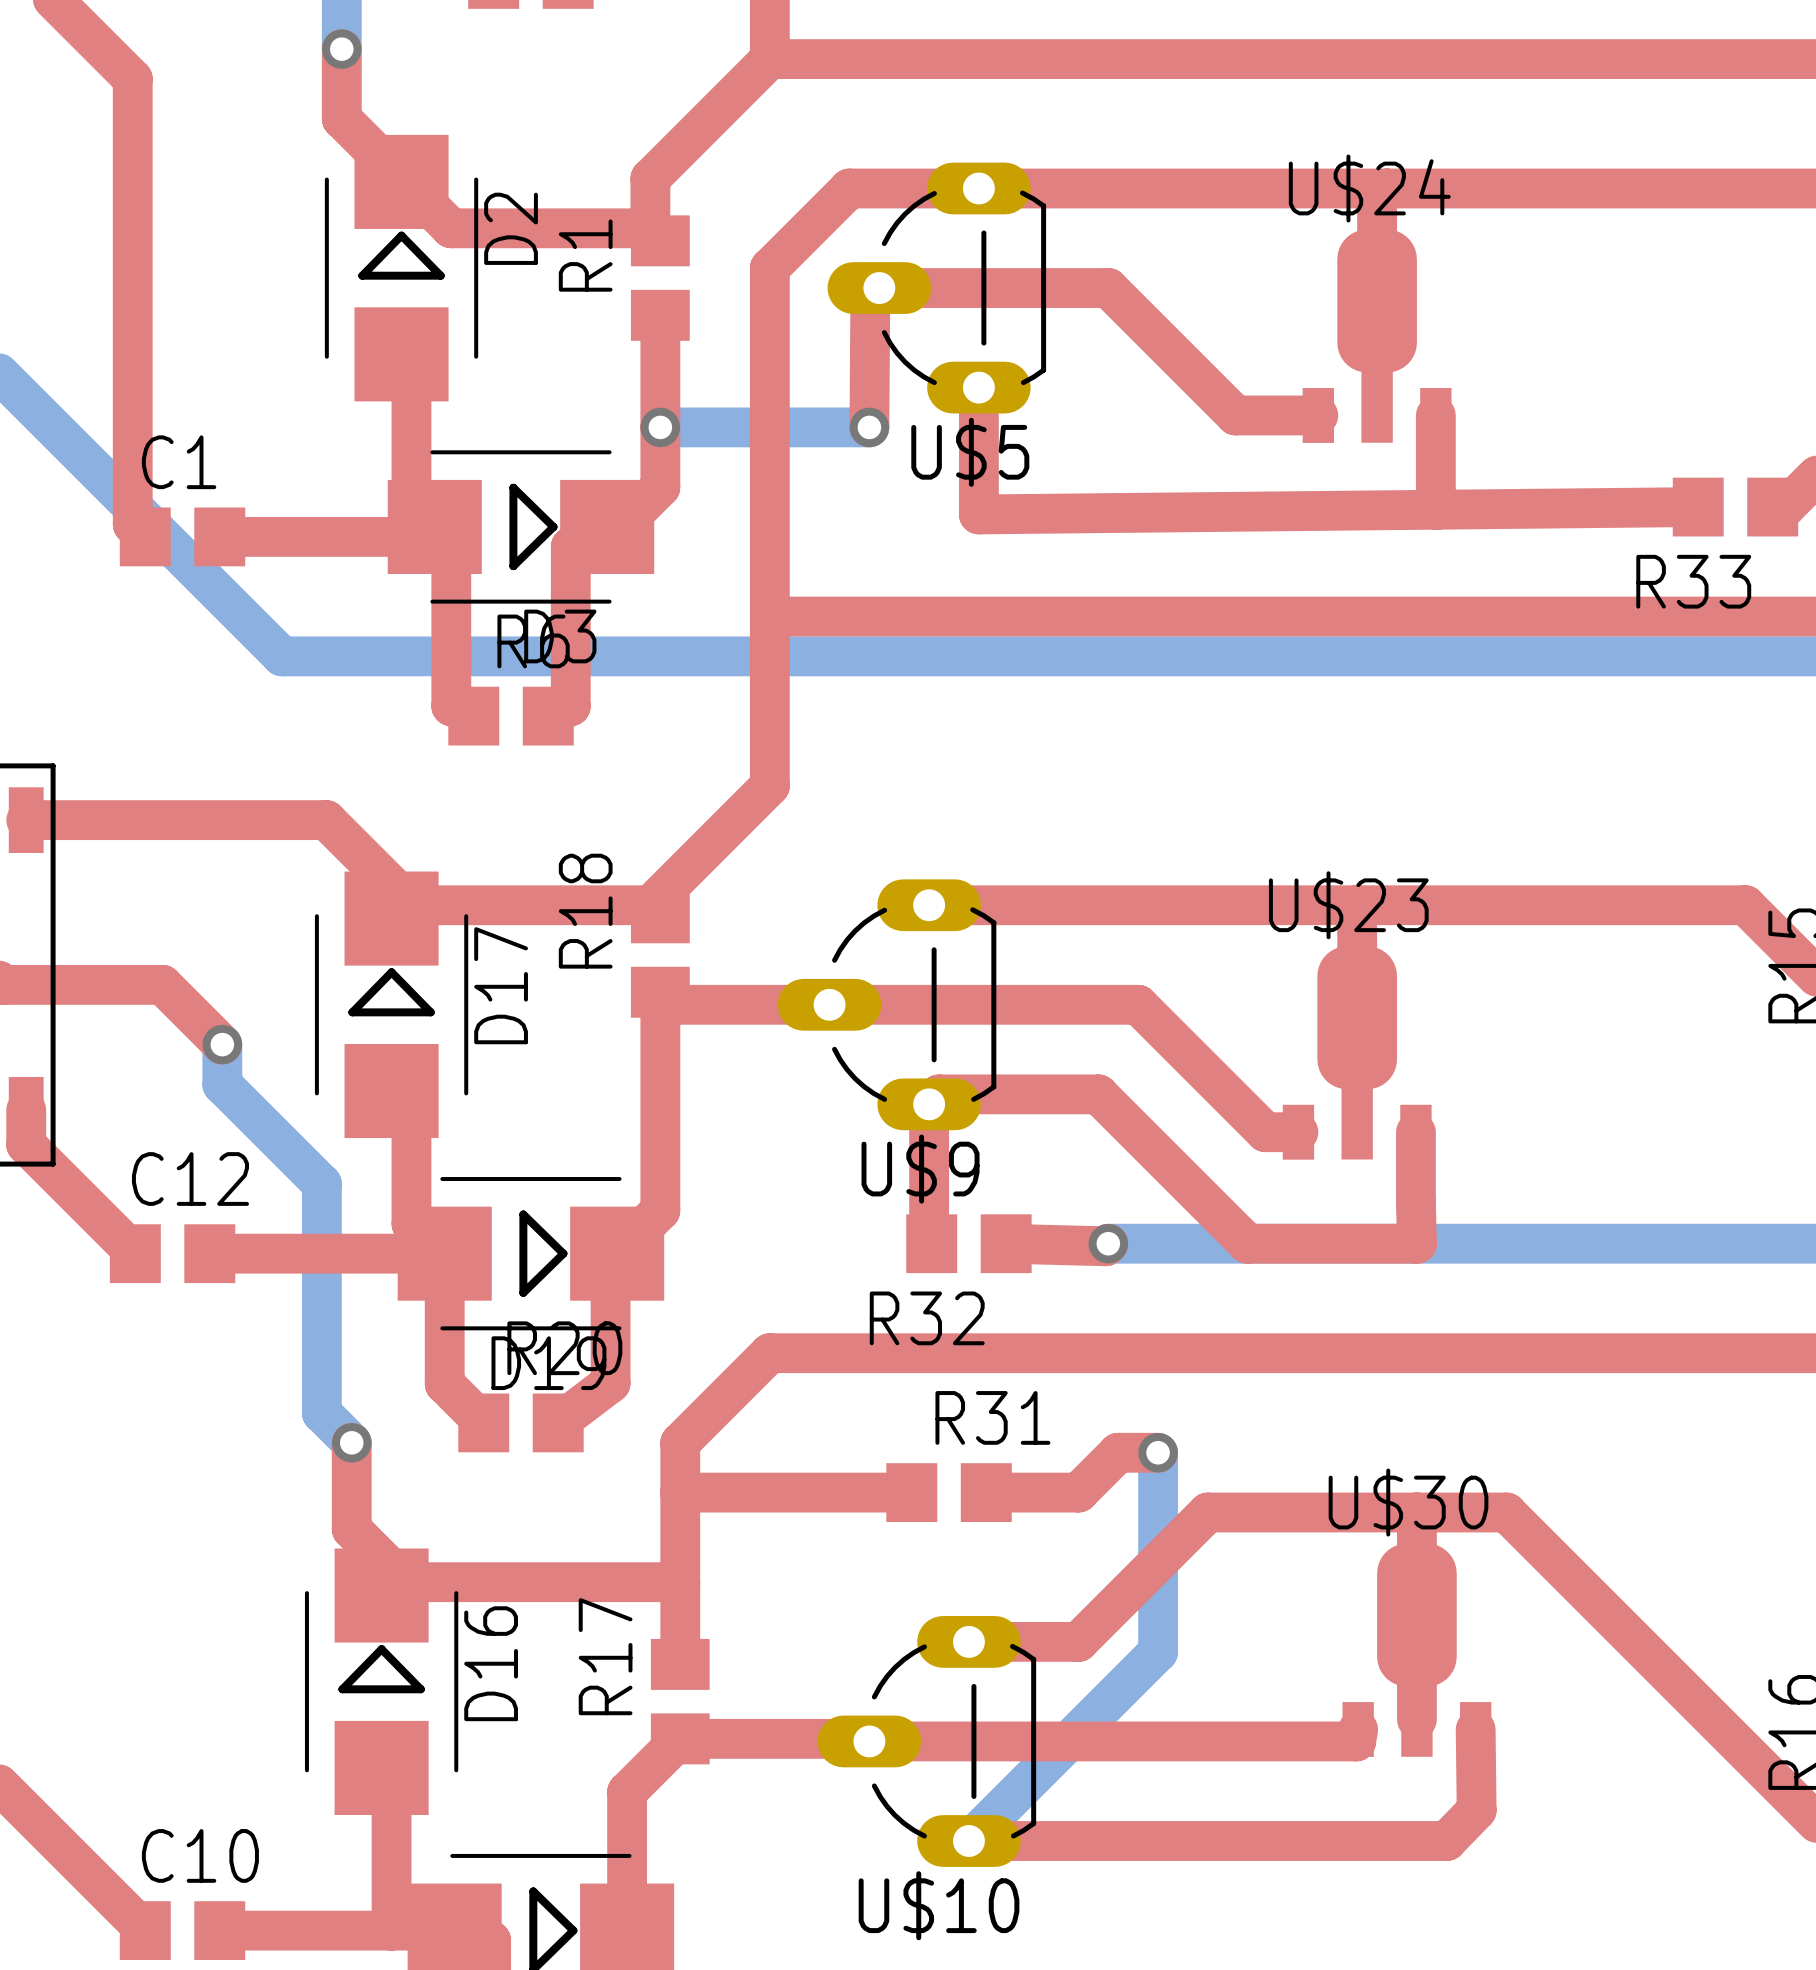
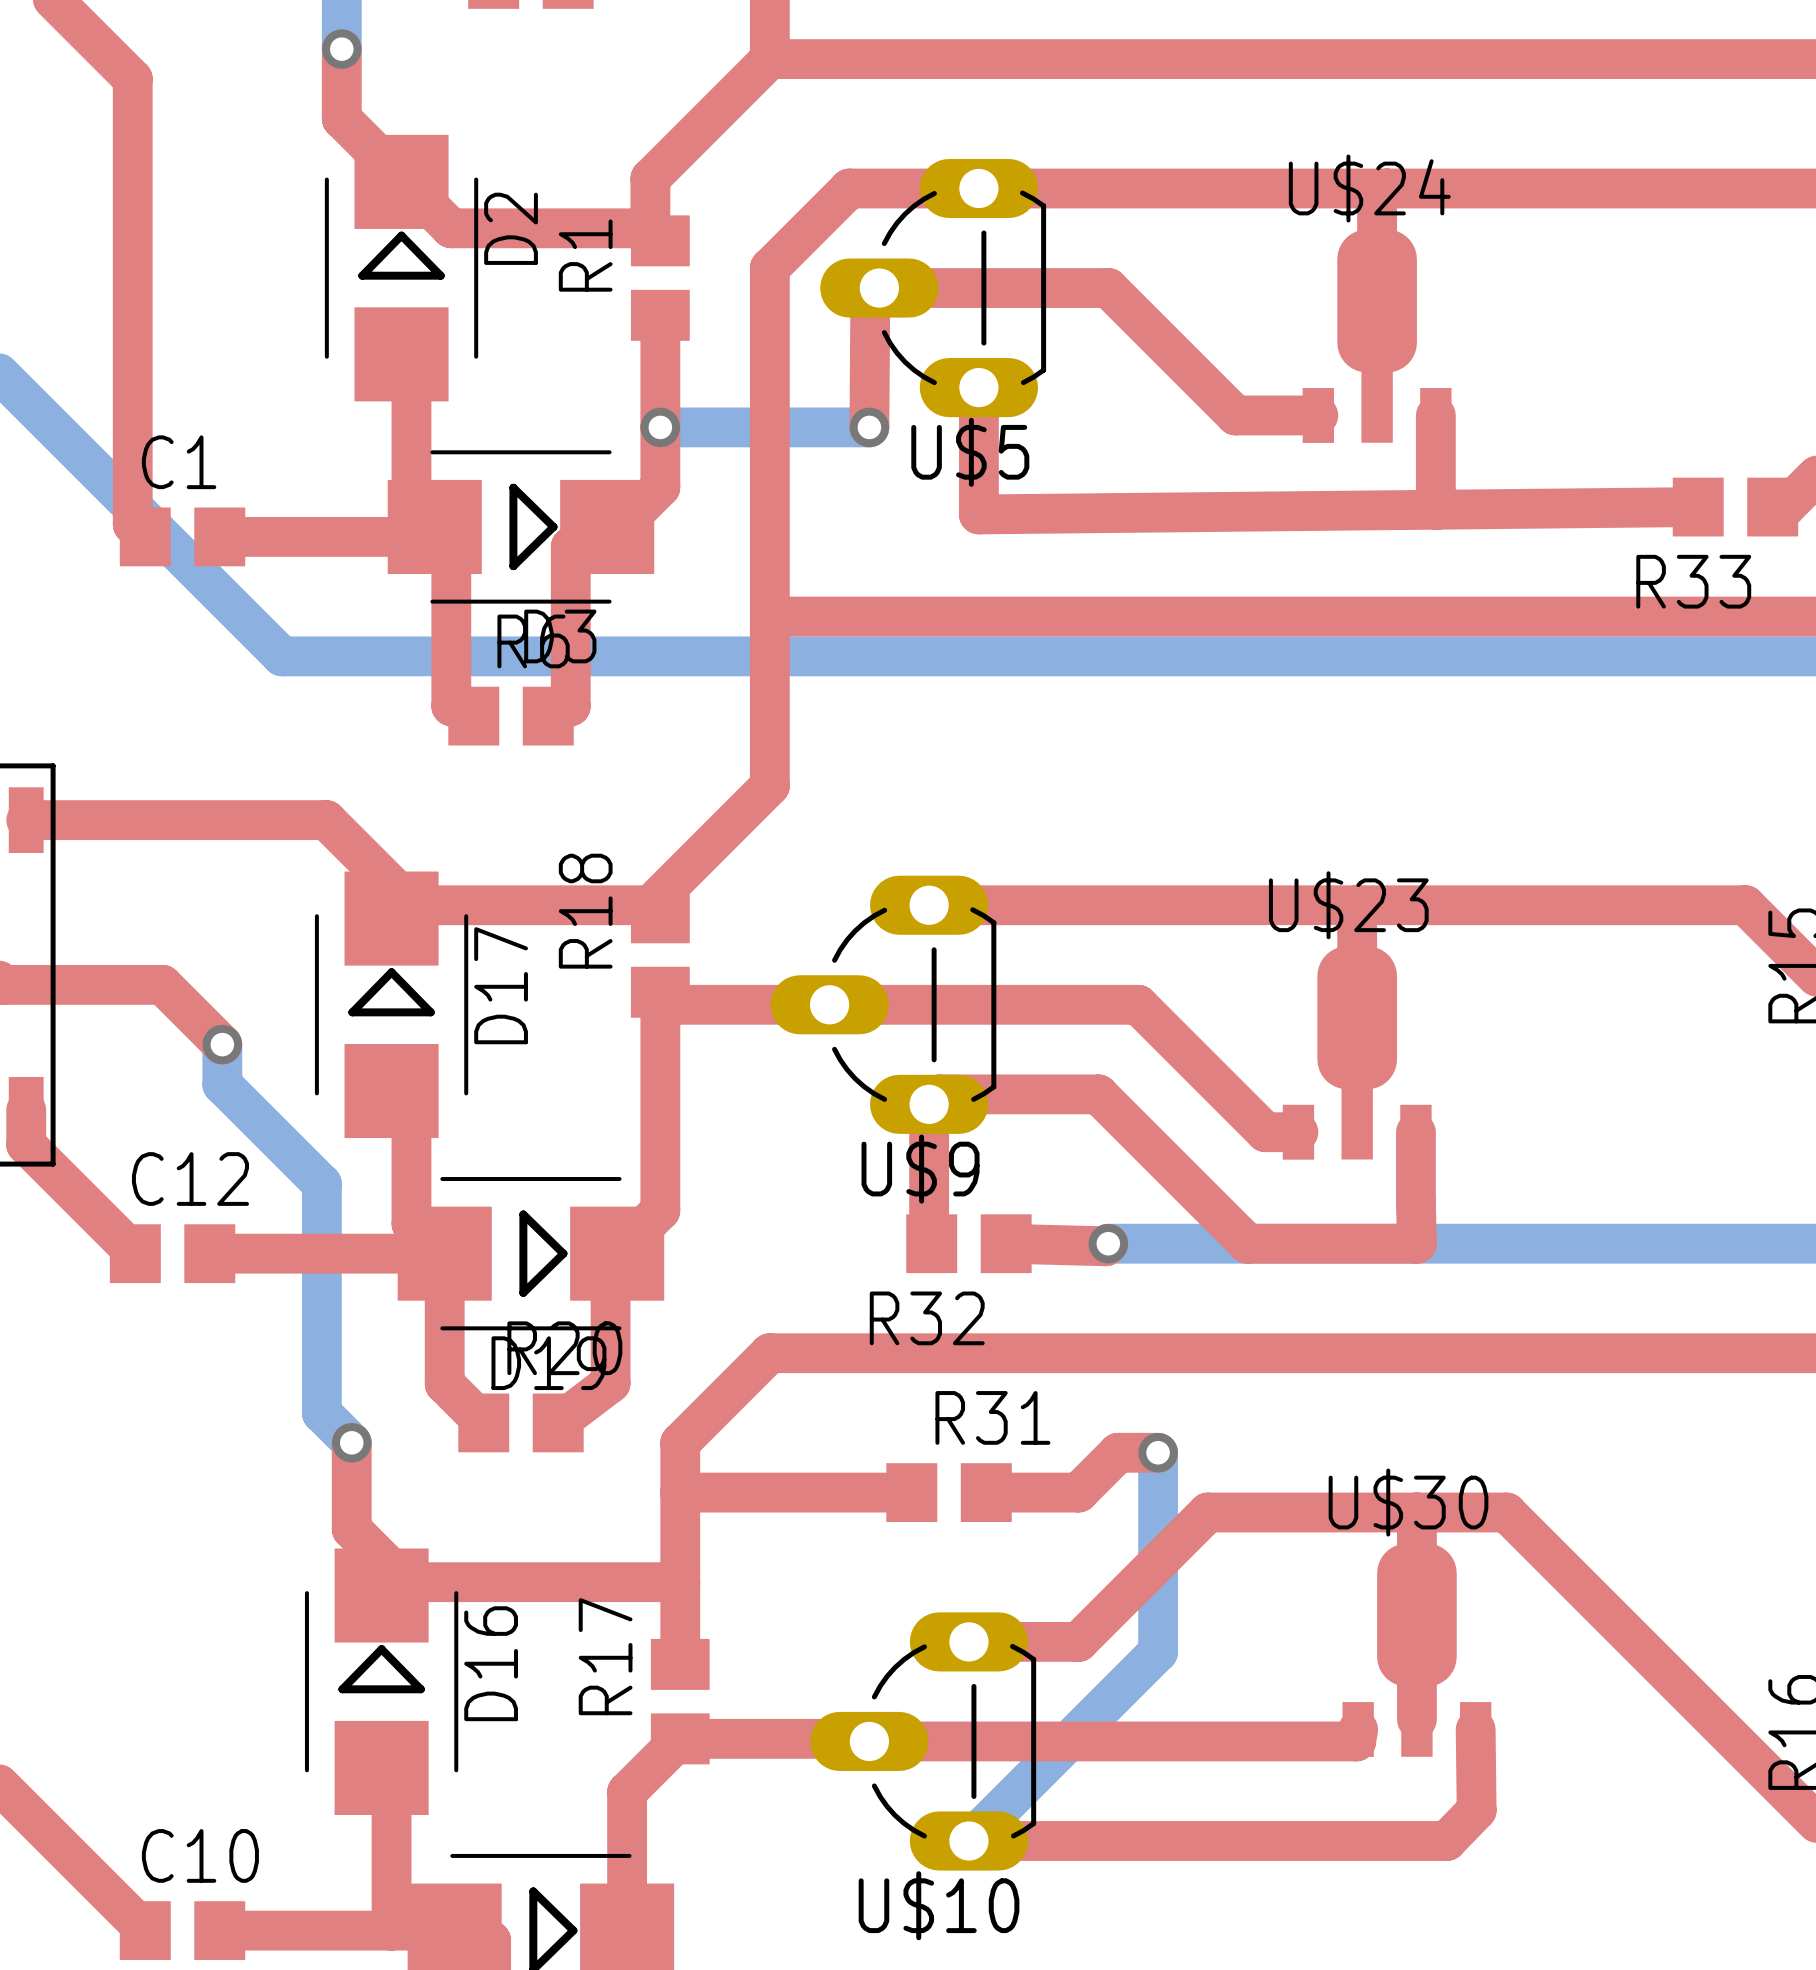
U$5 footprint: [827, 162, 1047, 414] -> [820, 158, 1047, 418]
U$9 footprint: [777, 879, 997, 1131] -> [770, 875, 997, 1134]
U$10 footprint: [817, 1616, 1037, 1867] -> [810, 1612, 1037, 1871]

